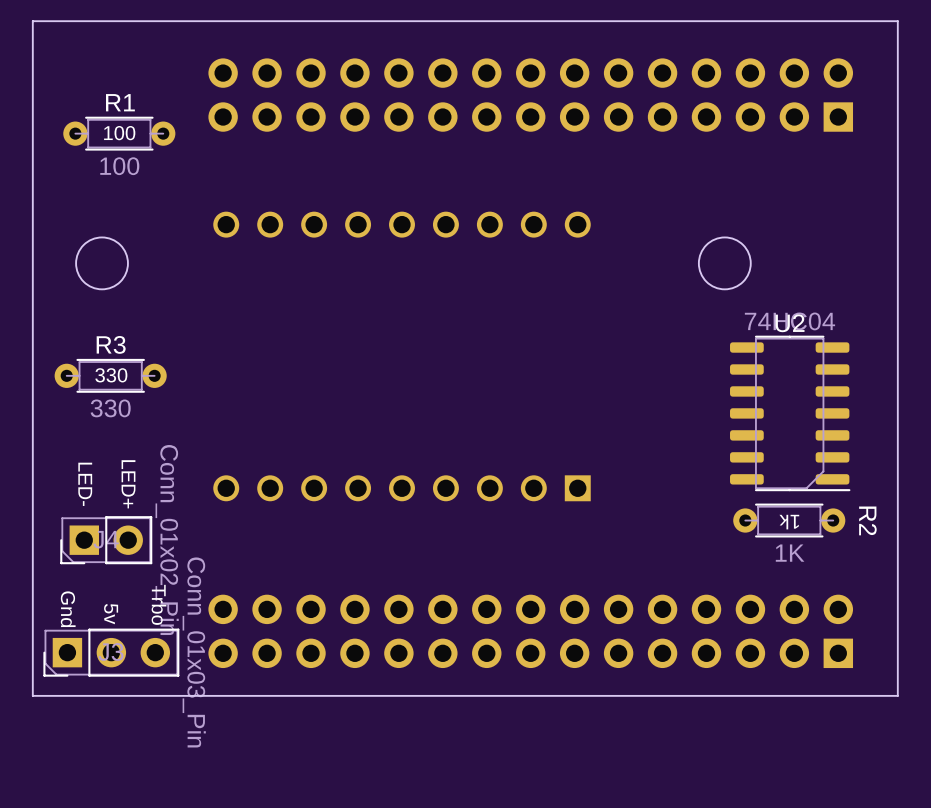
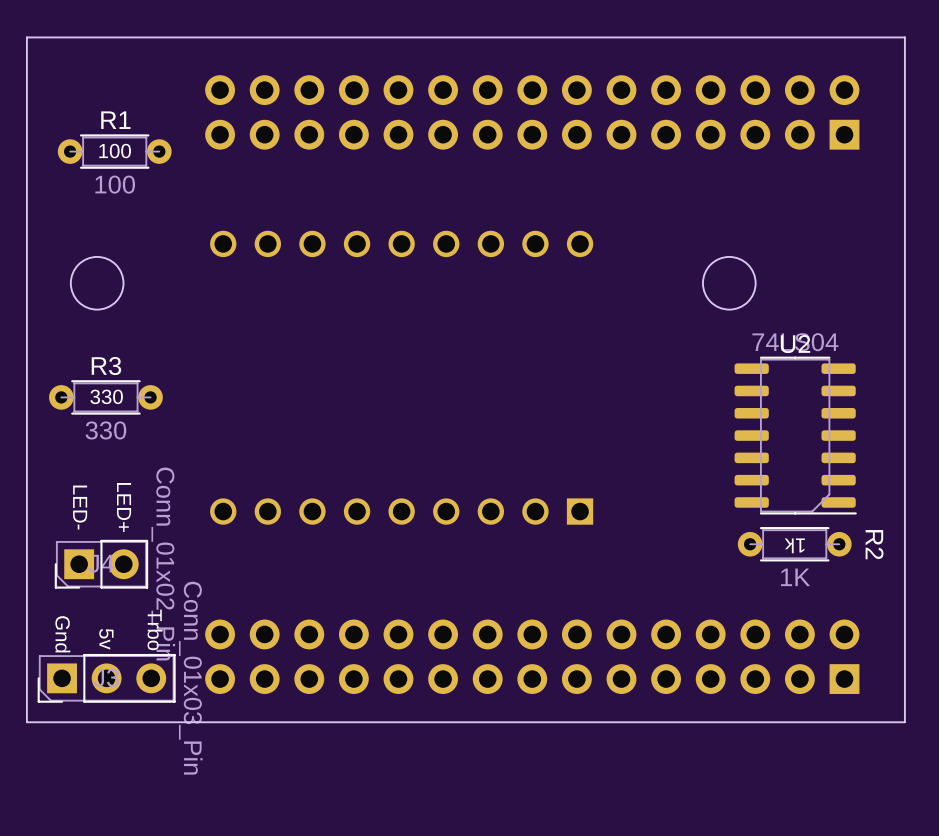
U2 value: 74HC04 (789, 321) -> 74LS04 (795, 342)

